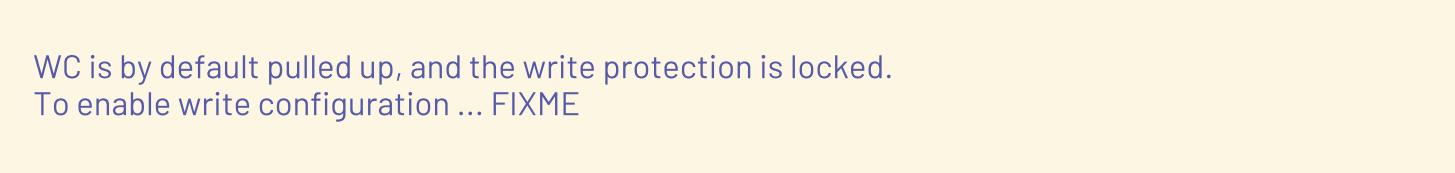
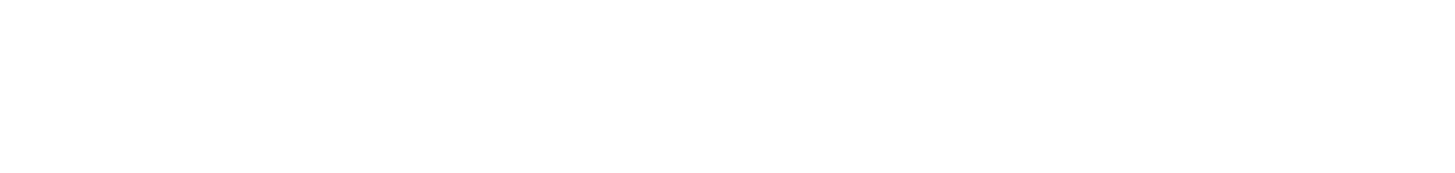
text: WC is by default pulled up, and the write protection is locked. (462, 69) -> none
text: To enable write configuration ... FIXME (306, 106) -> none

